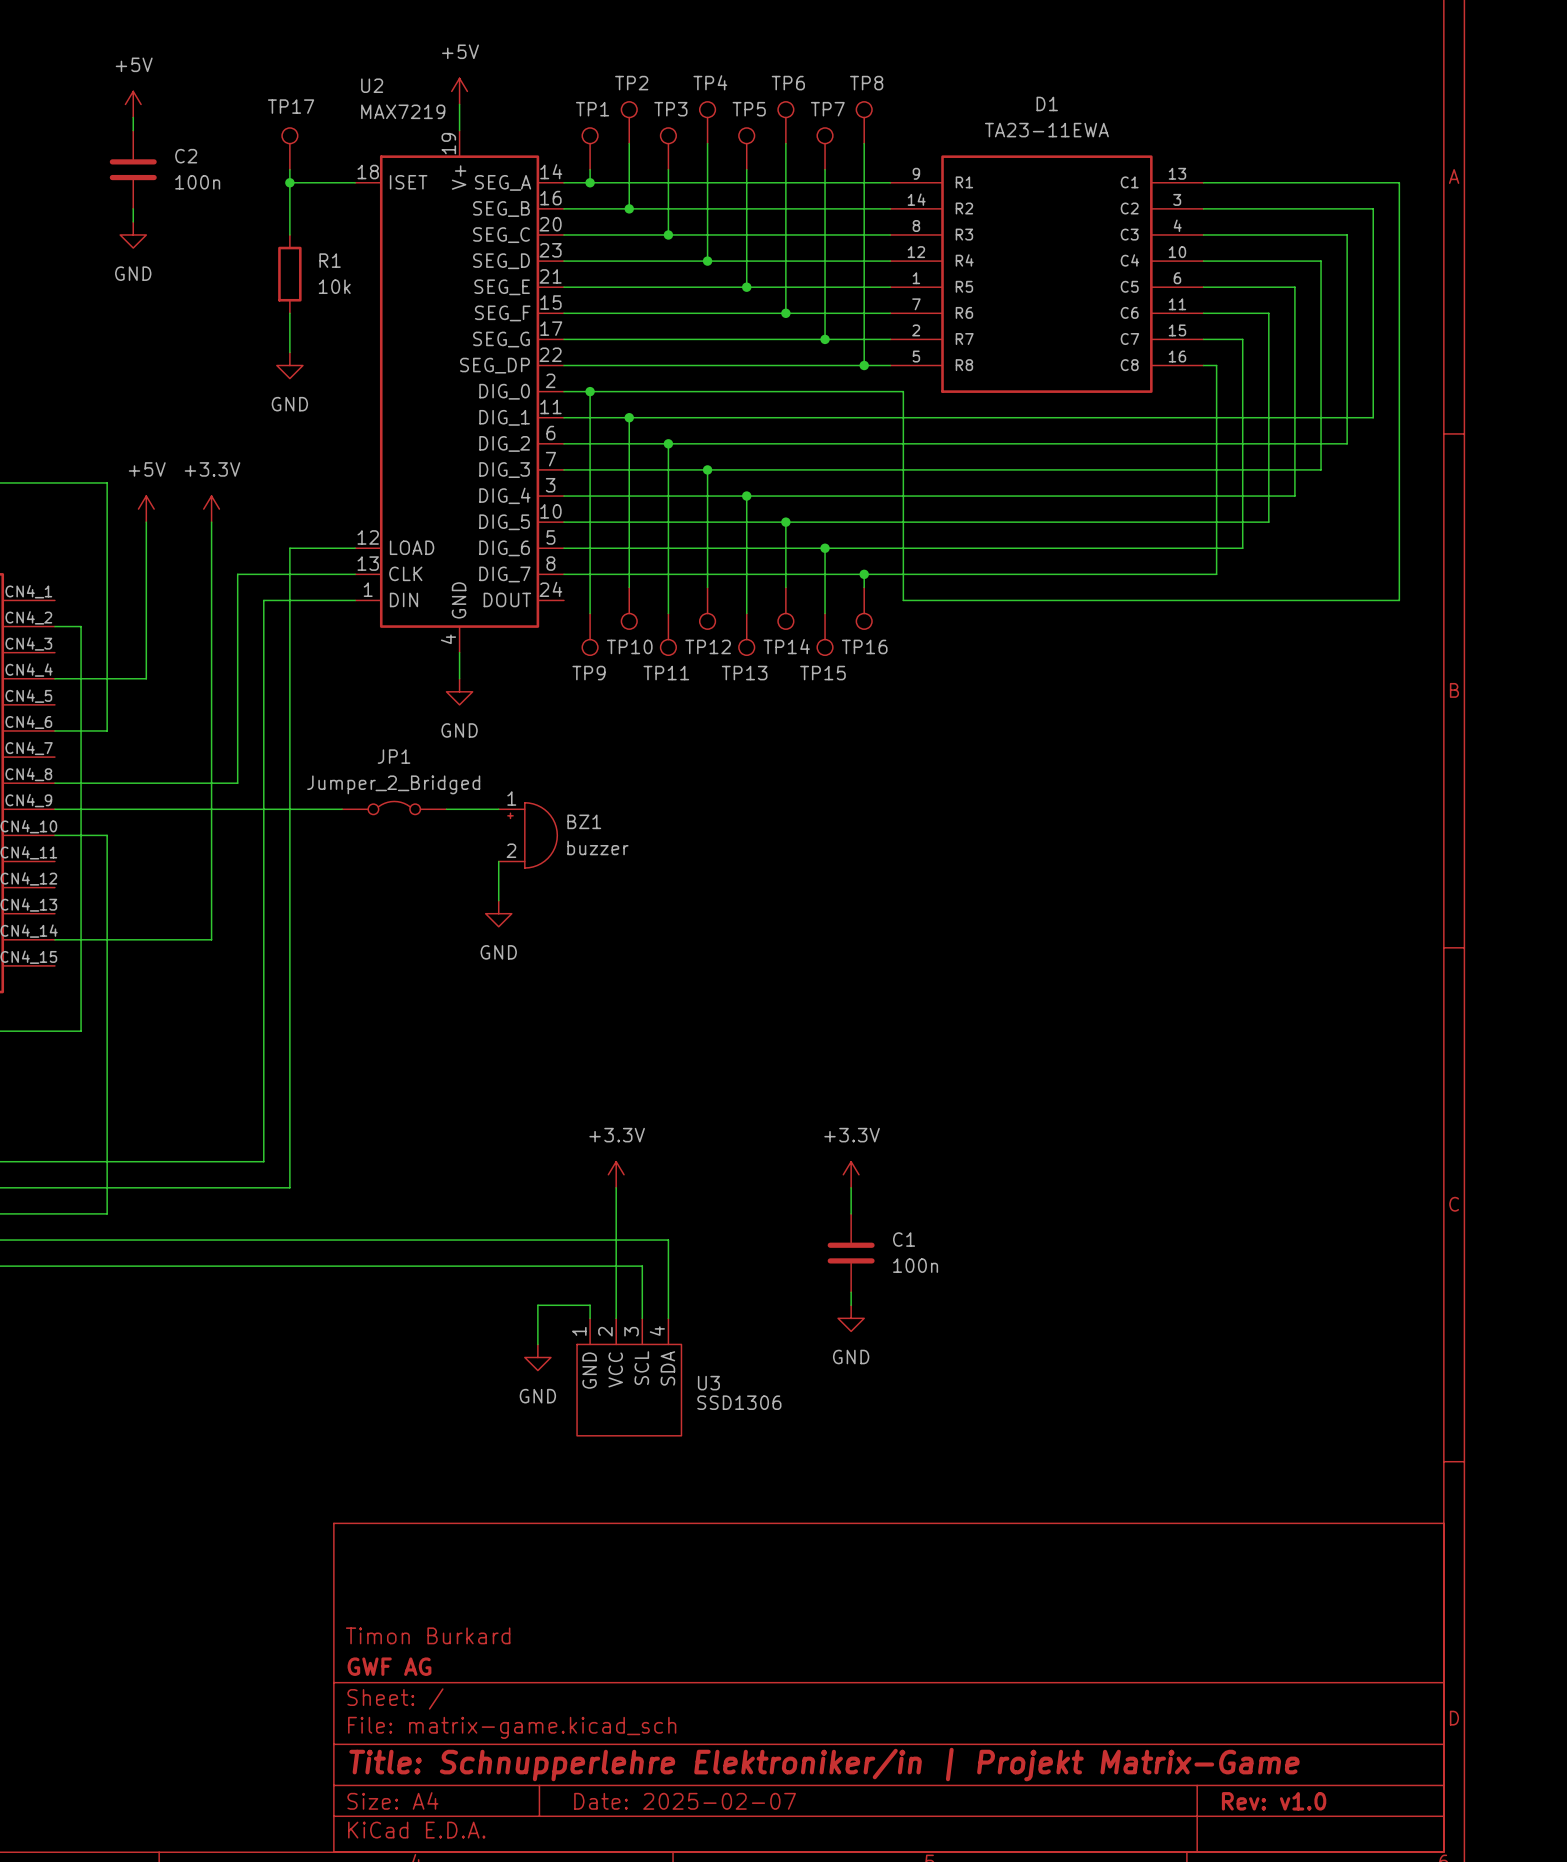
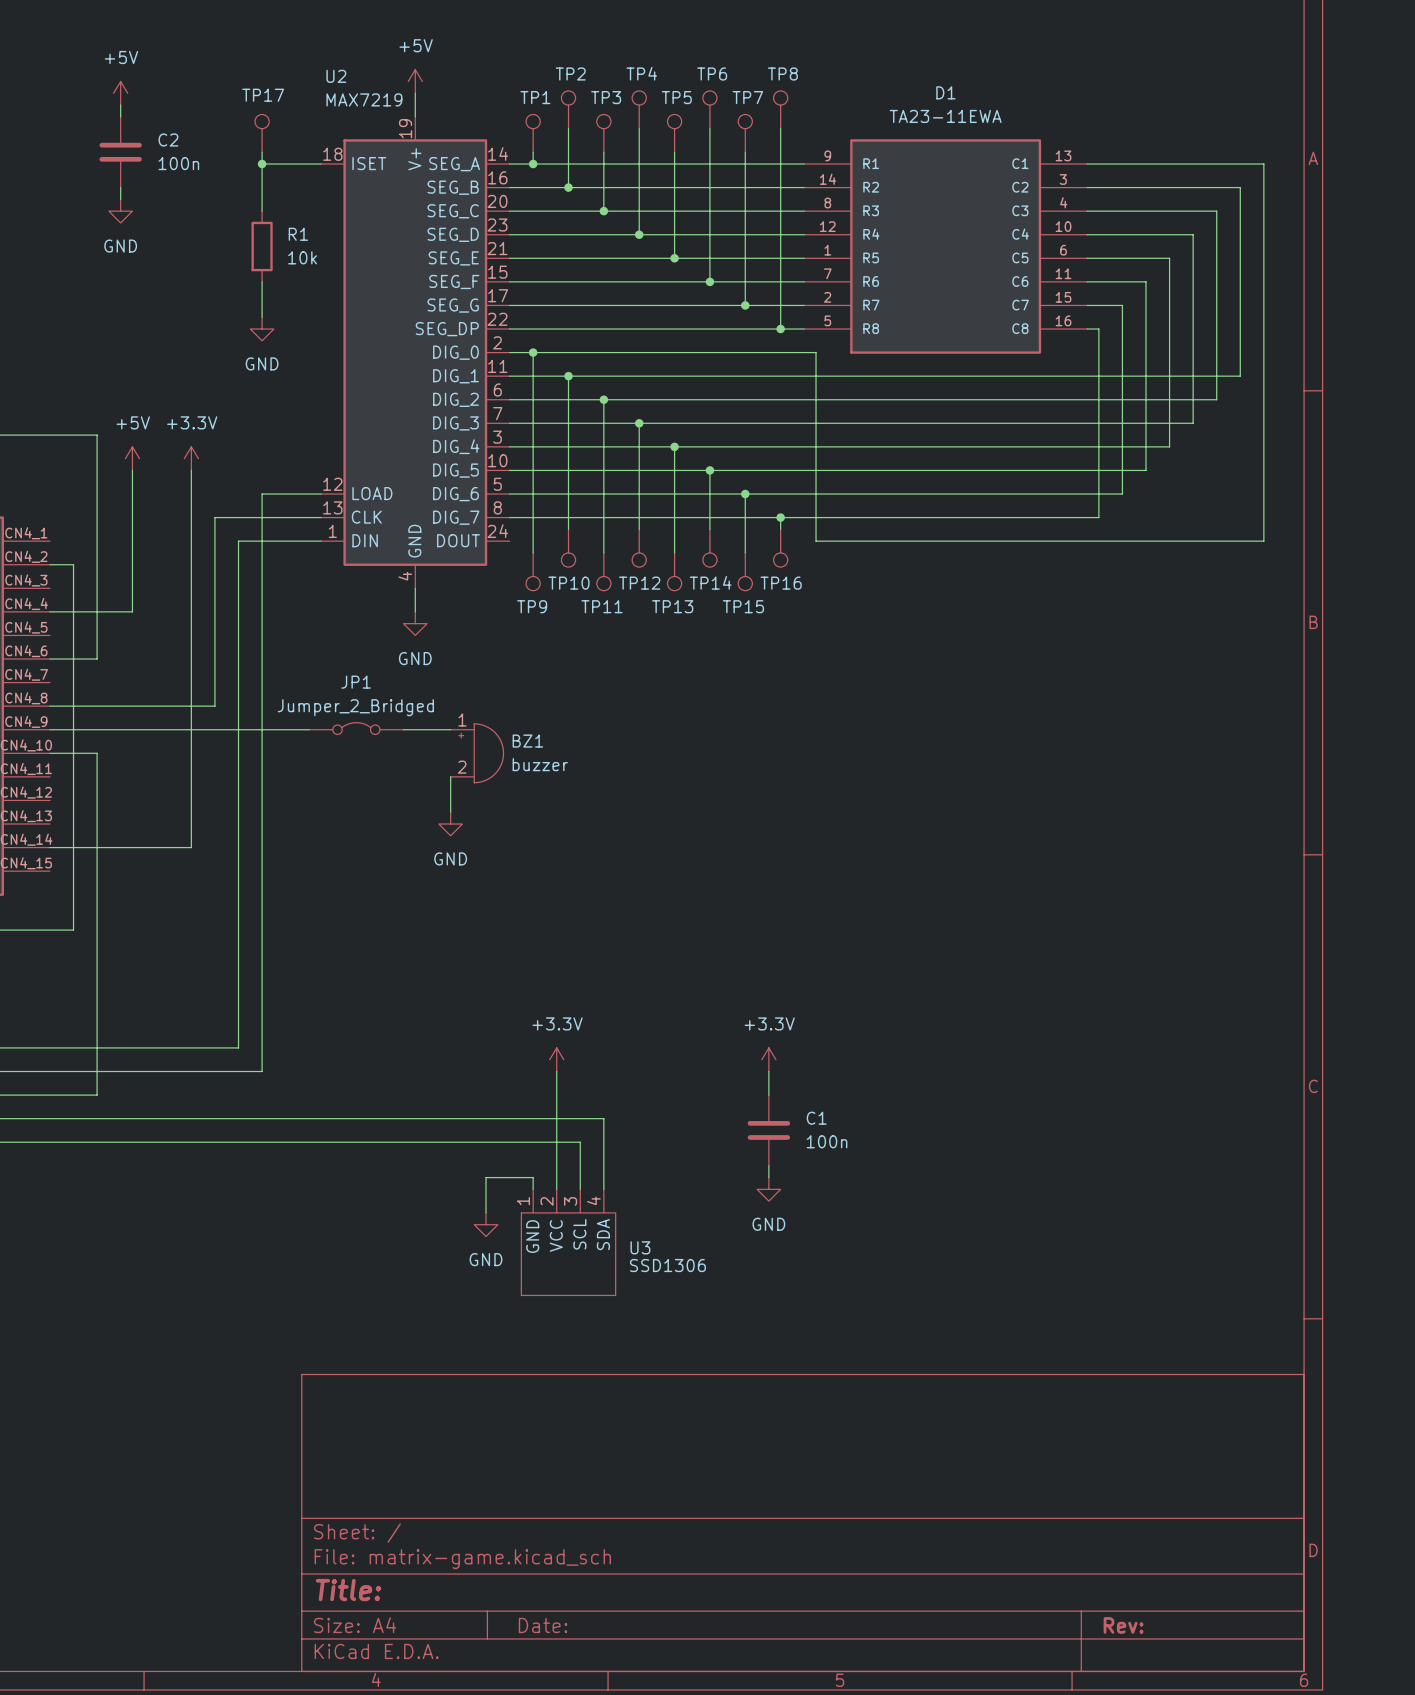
title block: Timon Burkard (428, 1635) -> none
title block: GWF AG (389, 1666) -> none
title block: Title: Schnupperlehre Elektroniker/in | Projekt Matrix-Game (824, 1764) -> Title: (348, 1590)
title block: Date: 2025-02-07 (685, 1801) -> Date: (543, 1625)
title block: Rev: v1.0 (1274, 1801) -> Rev: (1123, 1625)

